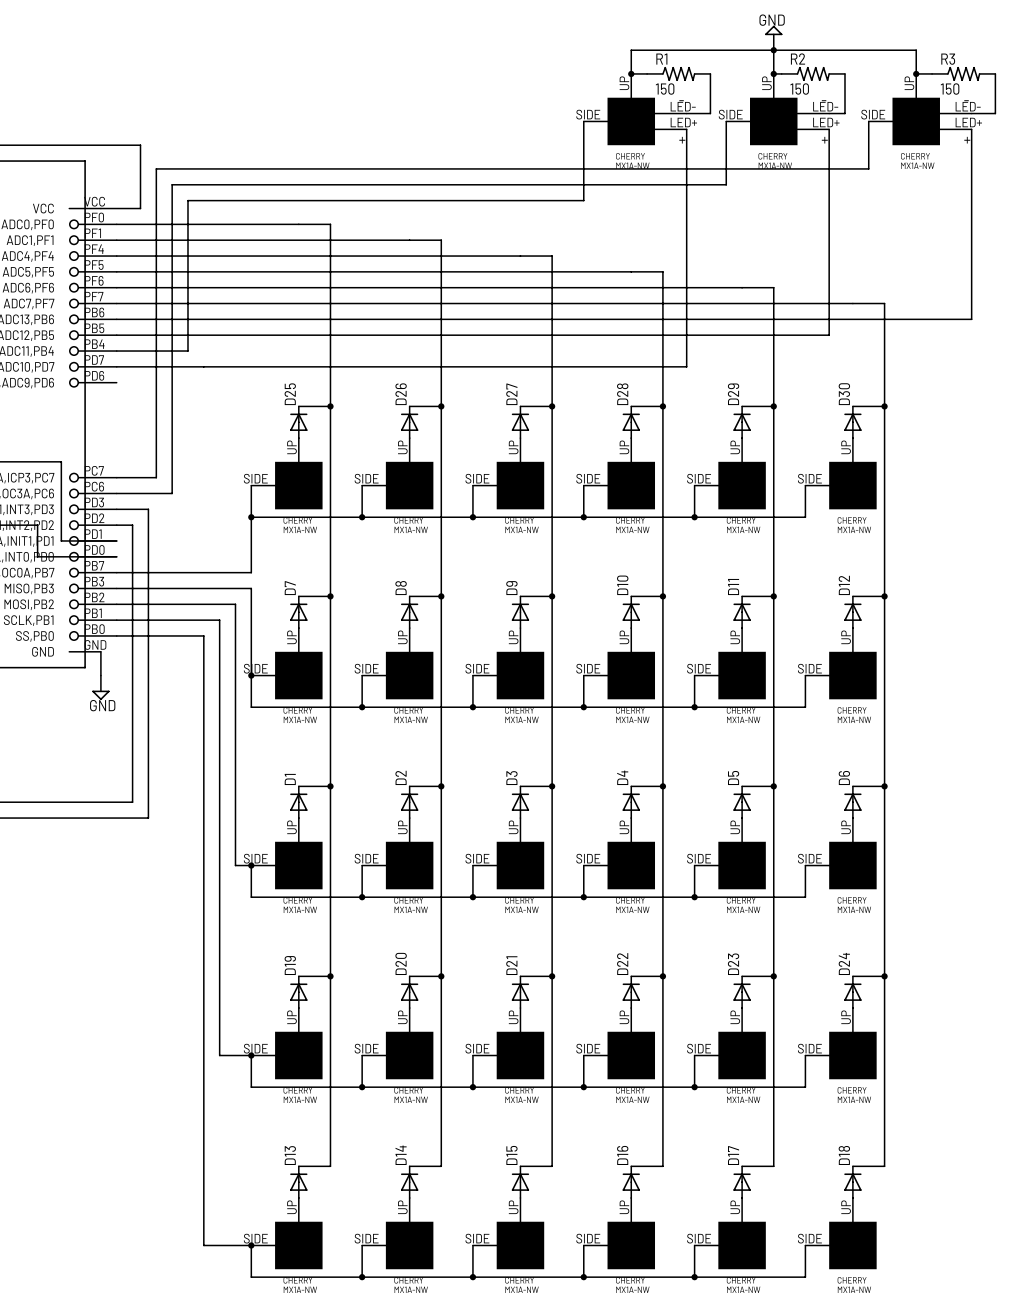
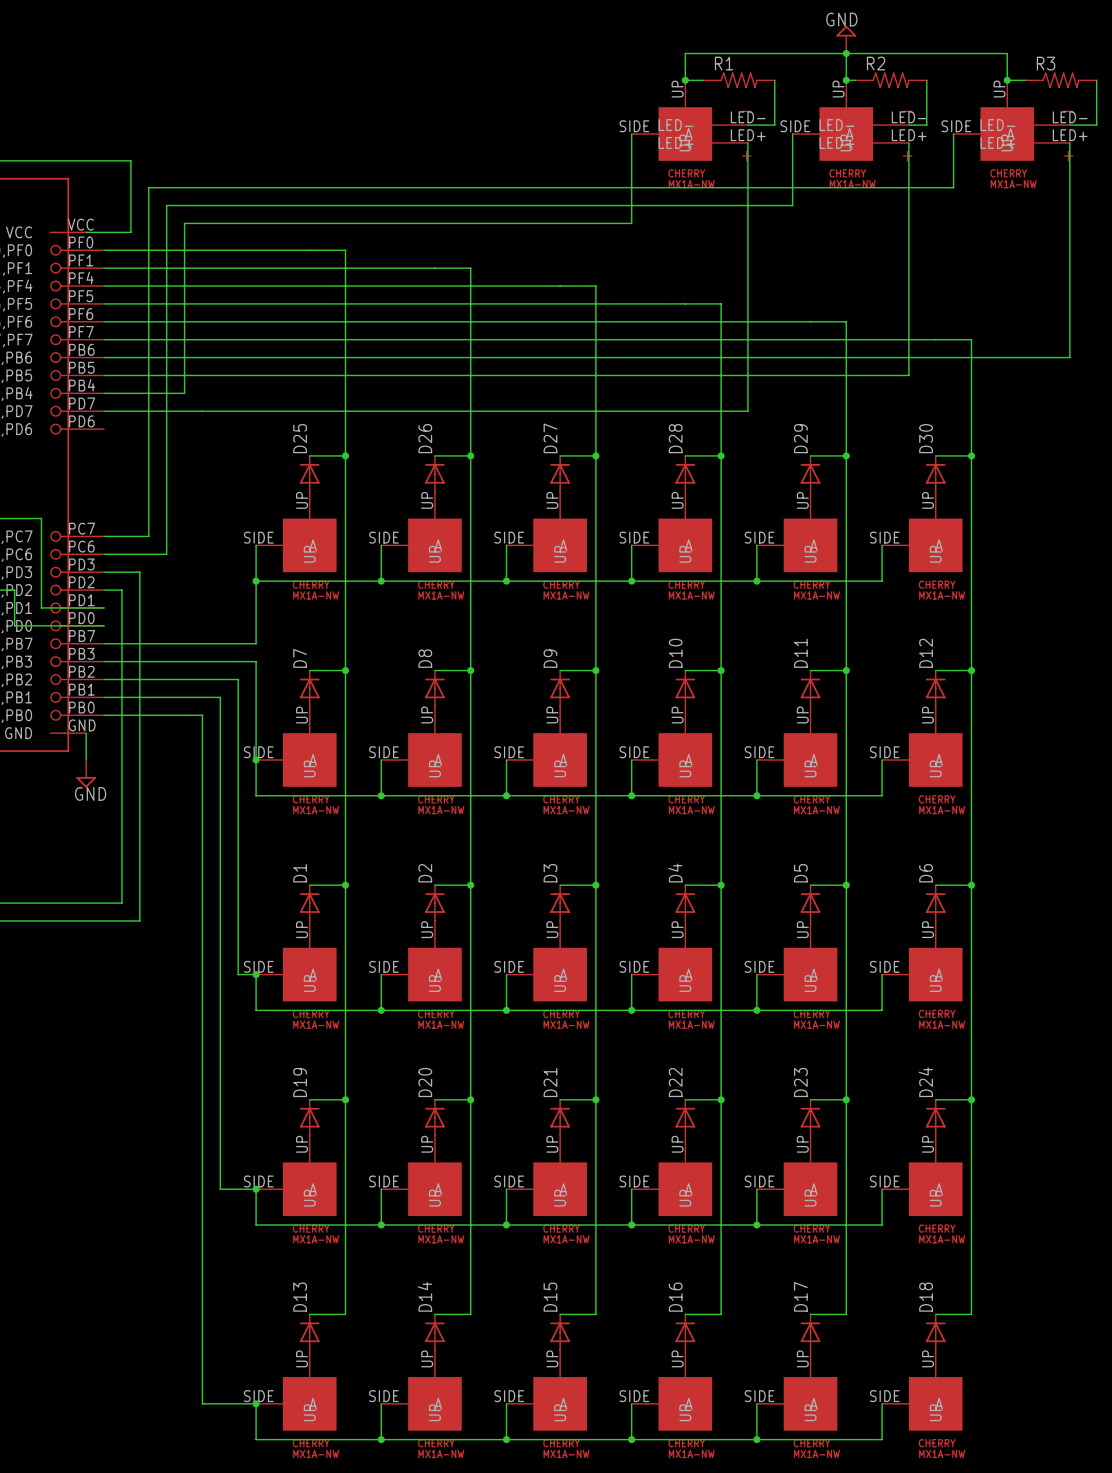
R1 value: 150 (665, 89) -> none
R2 value: 150 (799, 89) -> none
R3 value: 150 (950, 89) -> none

